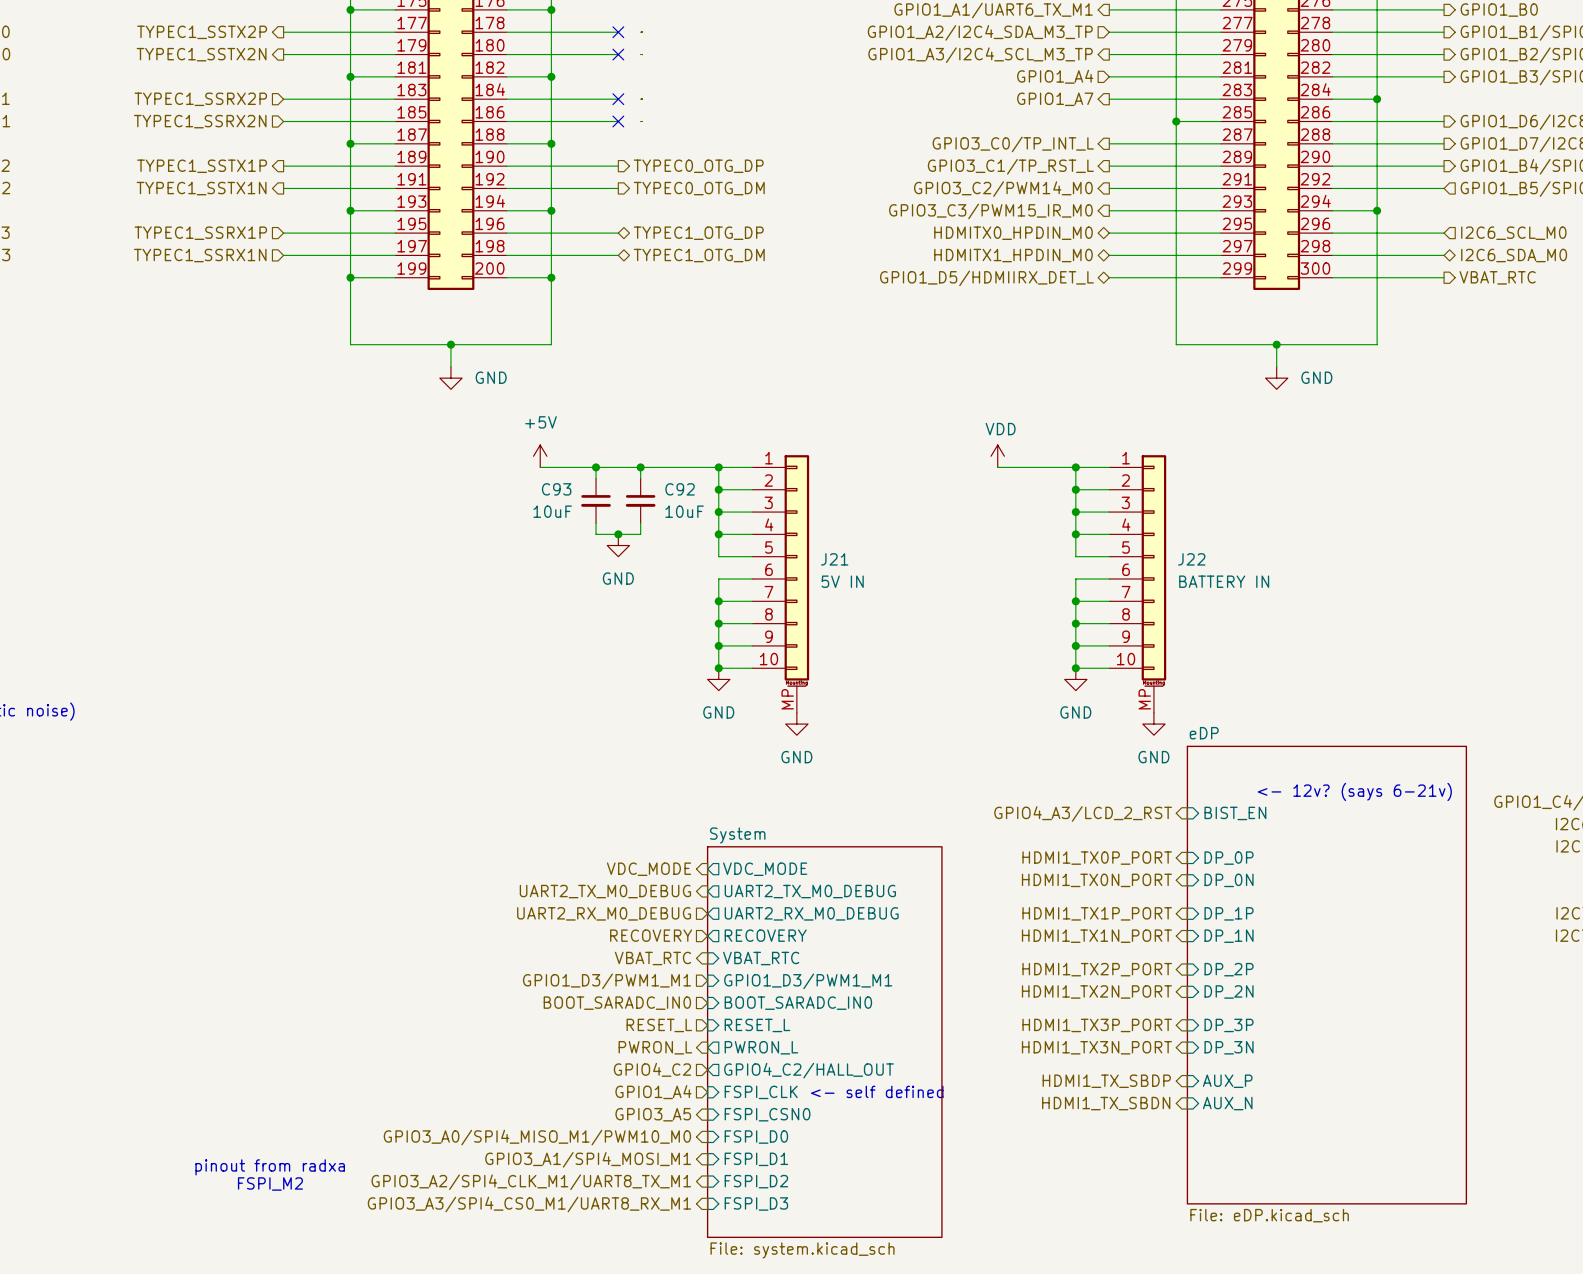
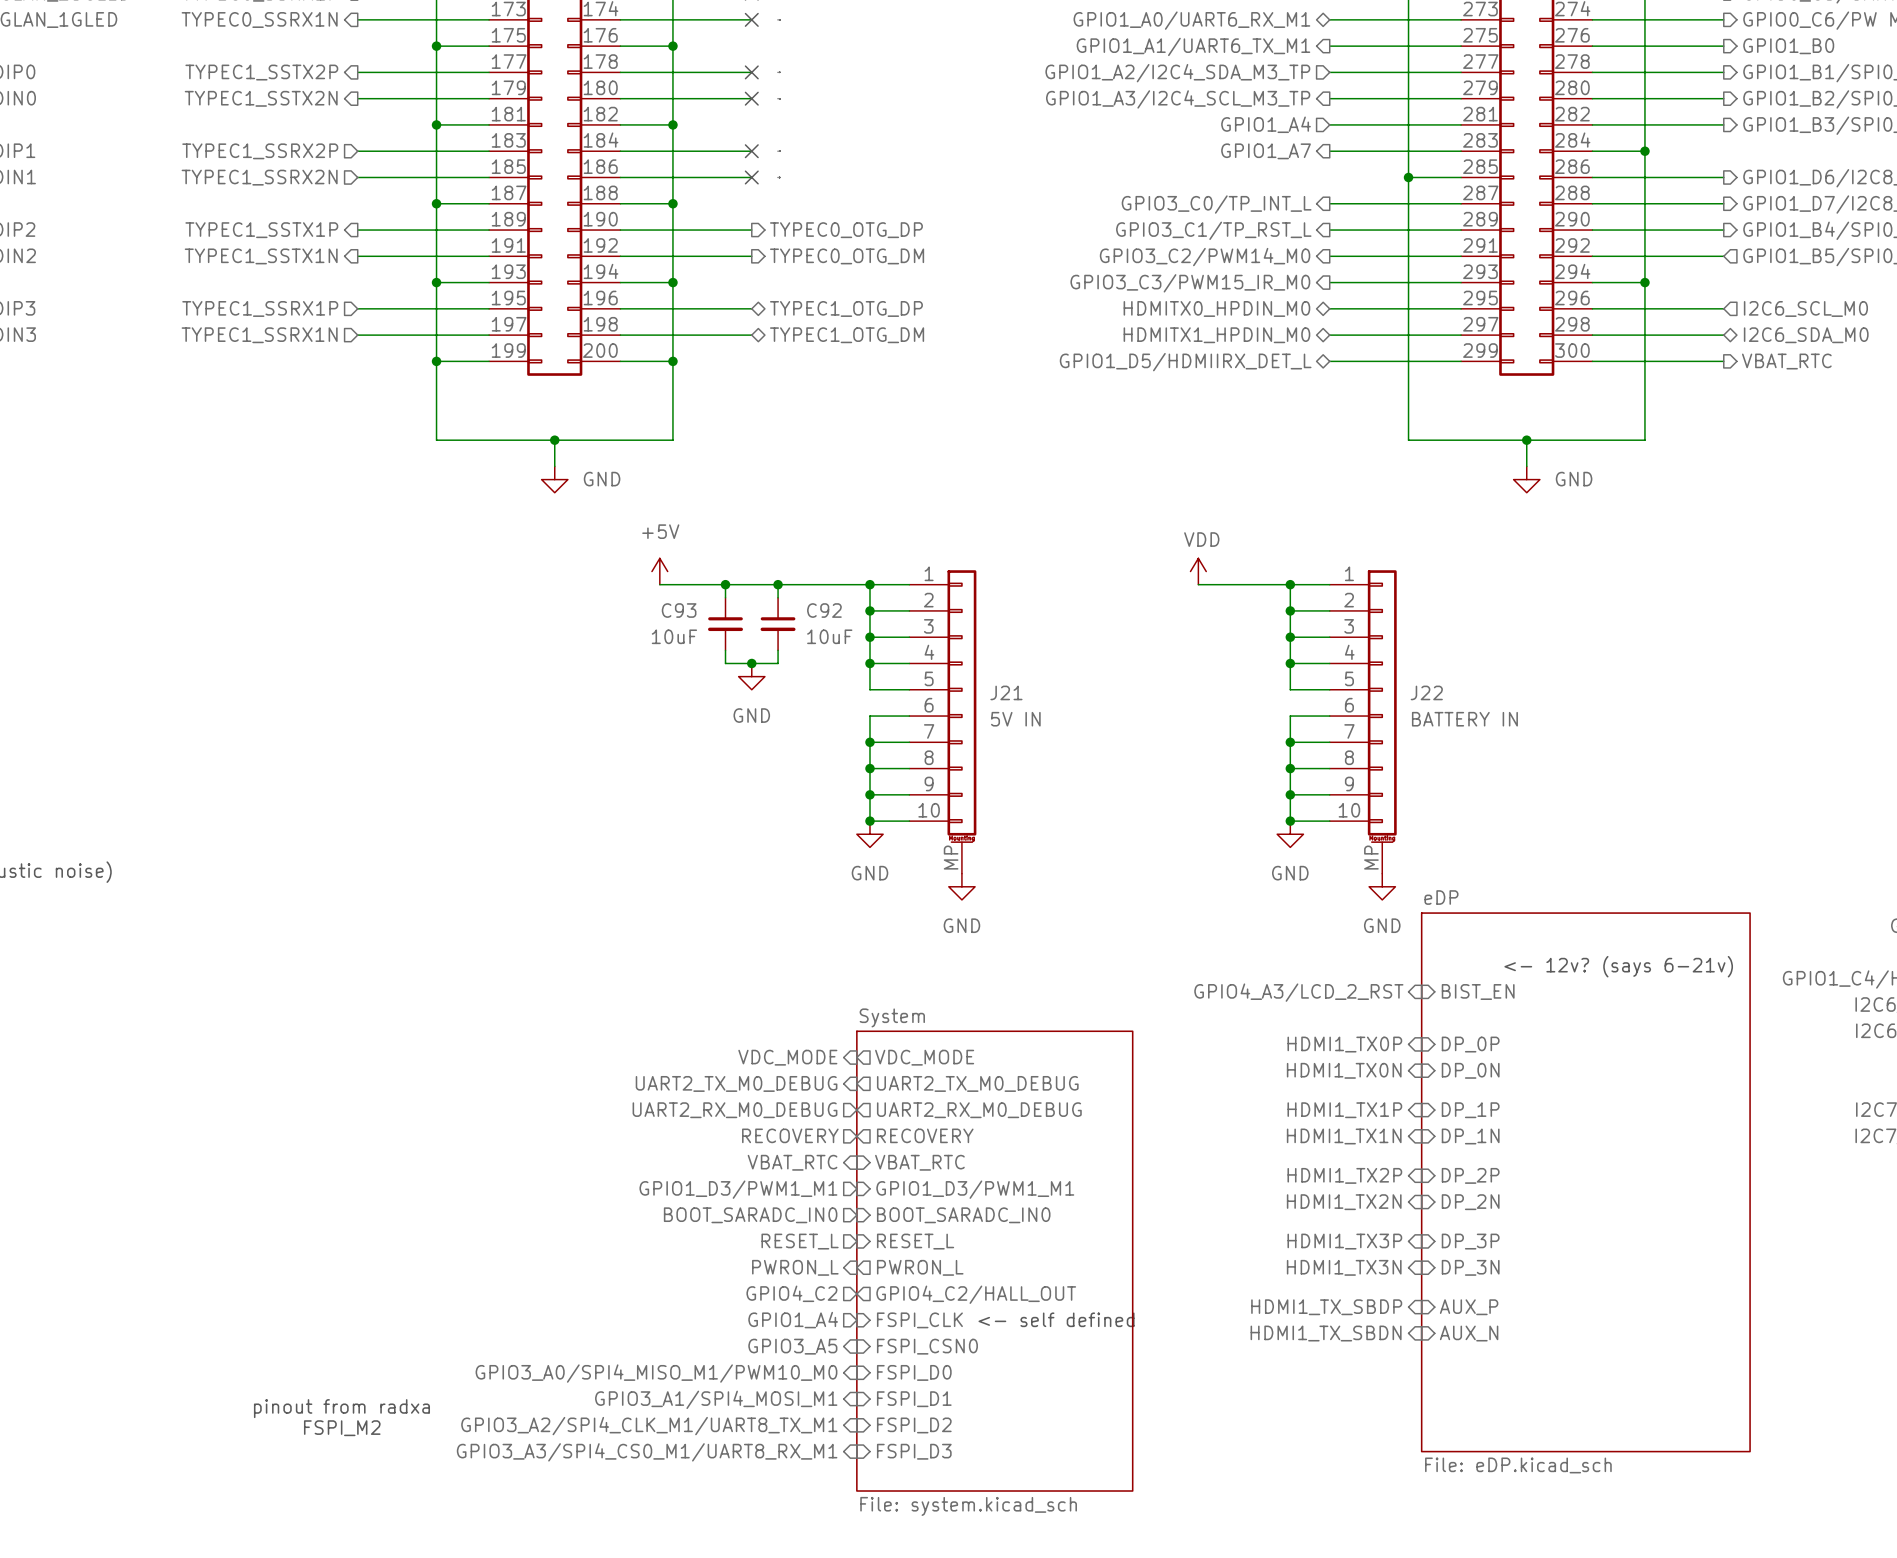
hierarchical label: HDMI1_TX0P_PORT (1097, 858) -> HDMI1_TX0P (1344, 1044)
hierarchical label: HDMI1_TX0N_PORT (1096, 880) -> HDMI1_TX0N (1344, 1070)
hierarchical label: HDMI1_TX1P_PORT (1097, 913) -> HDMI1_TX1P (1344, 1110)
hierarchical label: HDMI1_TX1N_PORT (1096, 936) -> HDMI1_TX1N (1344, 1136)
hierarchical label: HDMI1_TX2P_PORT (1097, 969) -> HDMI1_TX2P (1344, 1175)
hierarchical label: HDMI1_TX2N_PORT (1096, 991) -> HDMI1_TX2N (1344, 1202)
hierarchical label: HDMI1_TX3P_PORT (1097, 1025) -> HDMI1_TX3P (1344, 1241)
hierarchical label: HDMI1_TX3N_PORT (1096, 1047) -> HDMI1_TX3N (1344, 1267)

